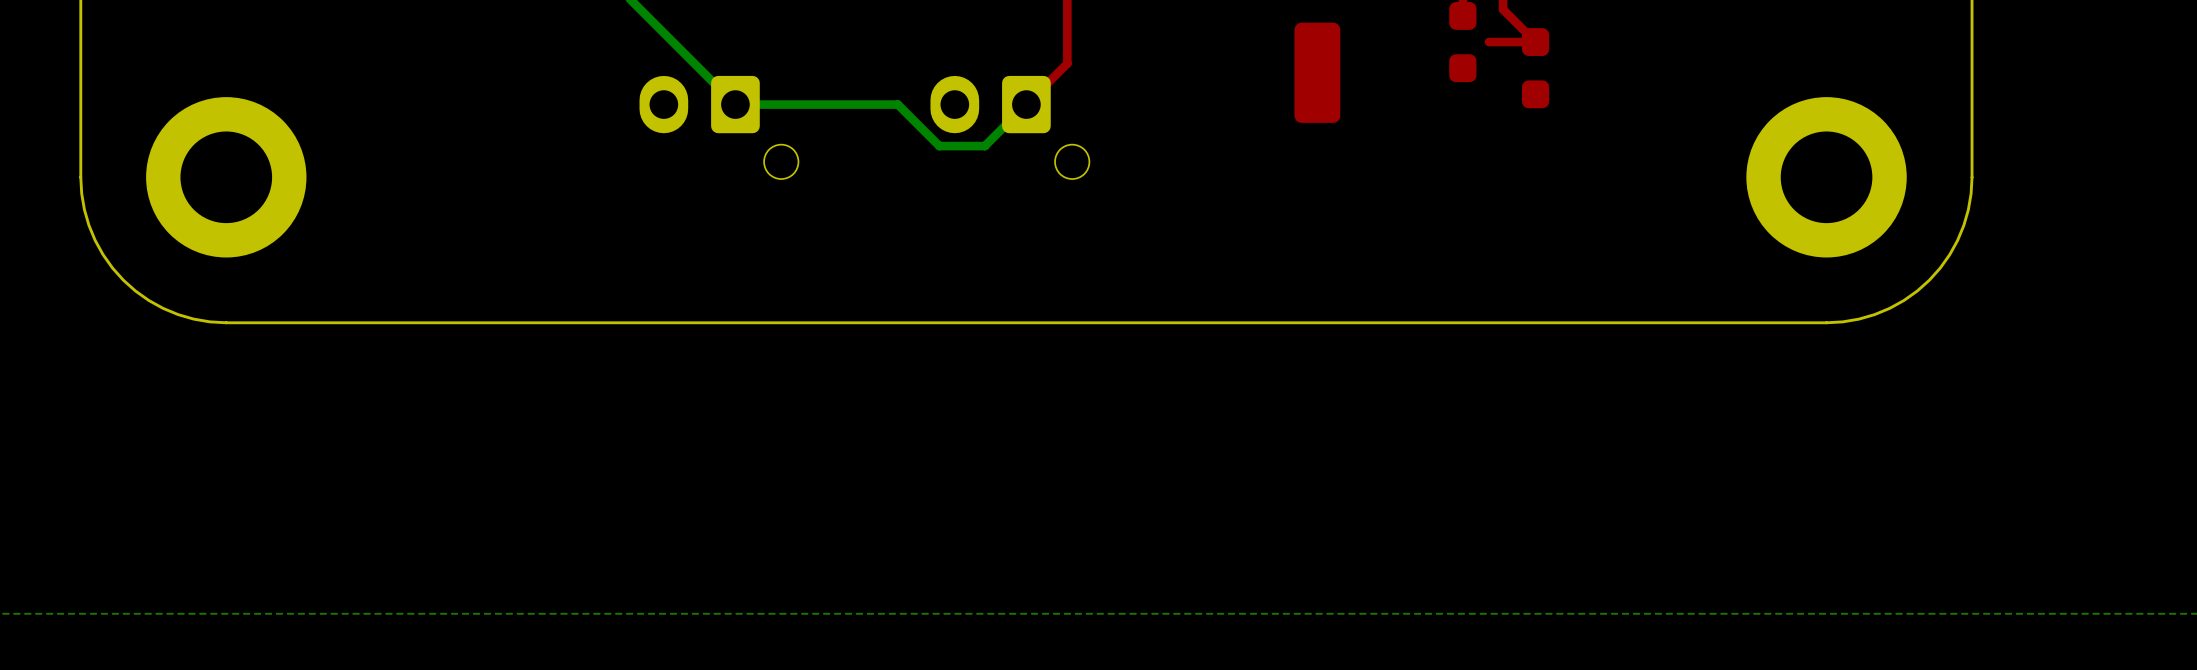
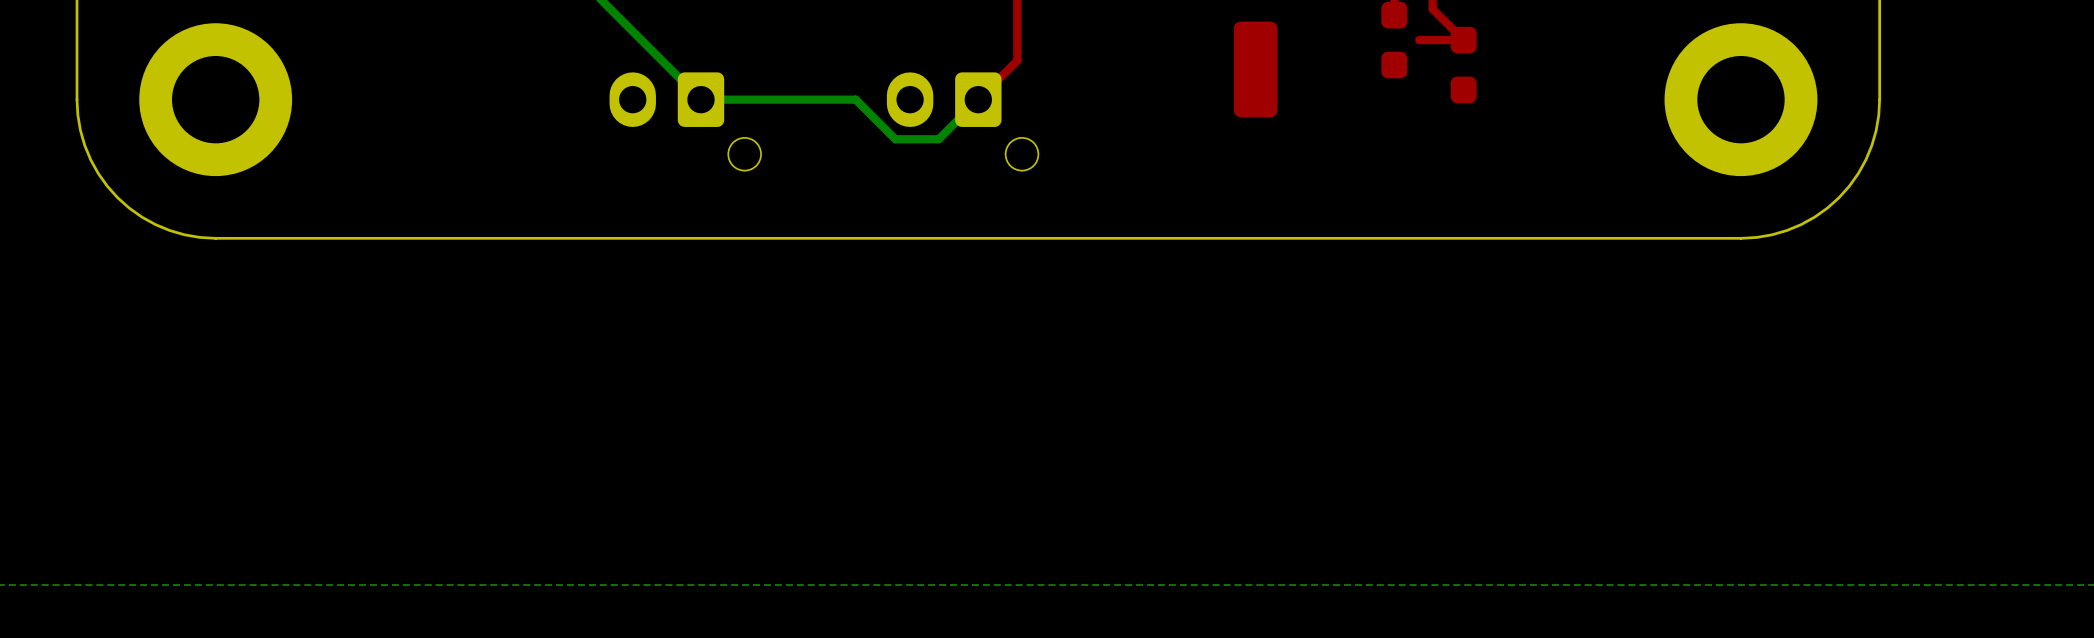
board edge: (1972, 104) (1971, 193) (1963, 225) (1949, 254) (1929, 280) (1903, 300) (1874, 314) (1842, 321) (1826, 322) (209, 321) (178, 314) (148, 300) (123, 280) (103, 254) (88, 225) (81, 193) (80, 104) -> (1879, 99) (1876, 130) (1865, 159) (1849, 186) (1839, 197) (1827, 208) (1801, 224) (1771, 234) (1740, 238) (200, 237) (169, 230) (141, 217) (129, 208) (107, 186) (90, 159) (84, 145) (80, 130) (76, 99)
part position: (226, 177) -> (215, 99)
part position: (1826, 177) -> (1740, 99)

